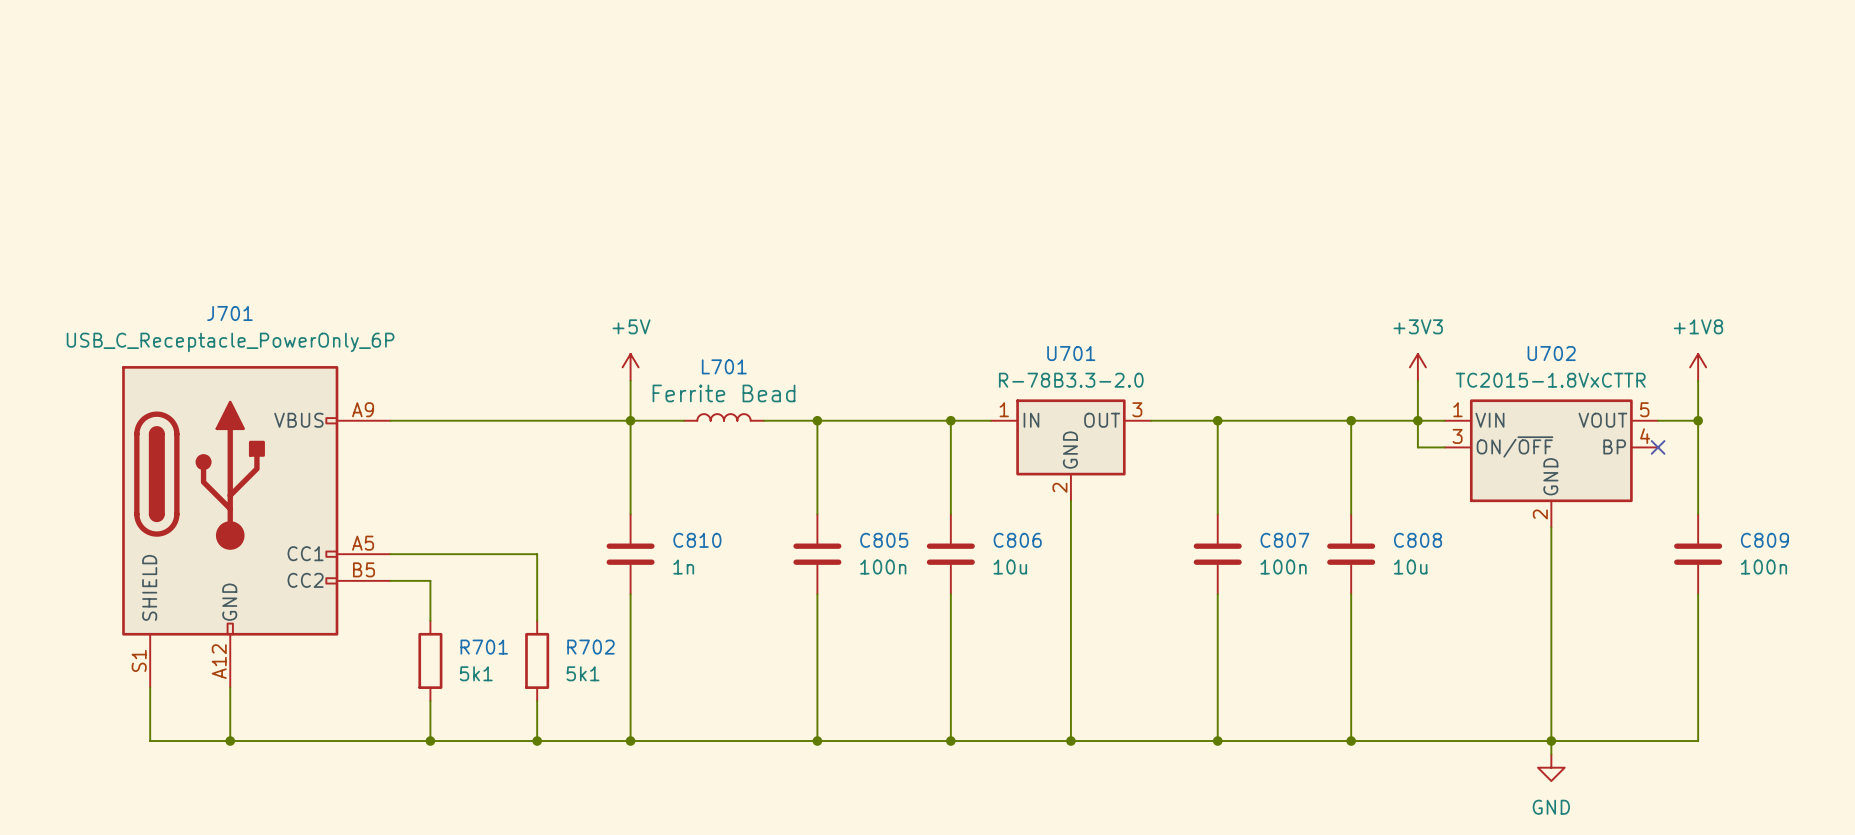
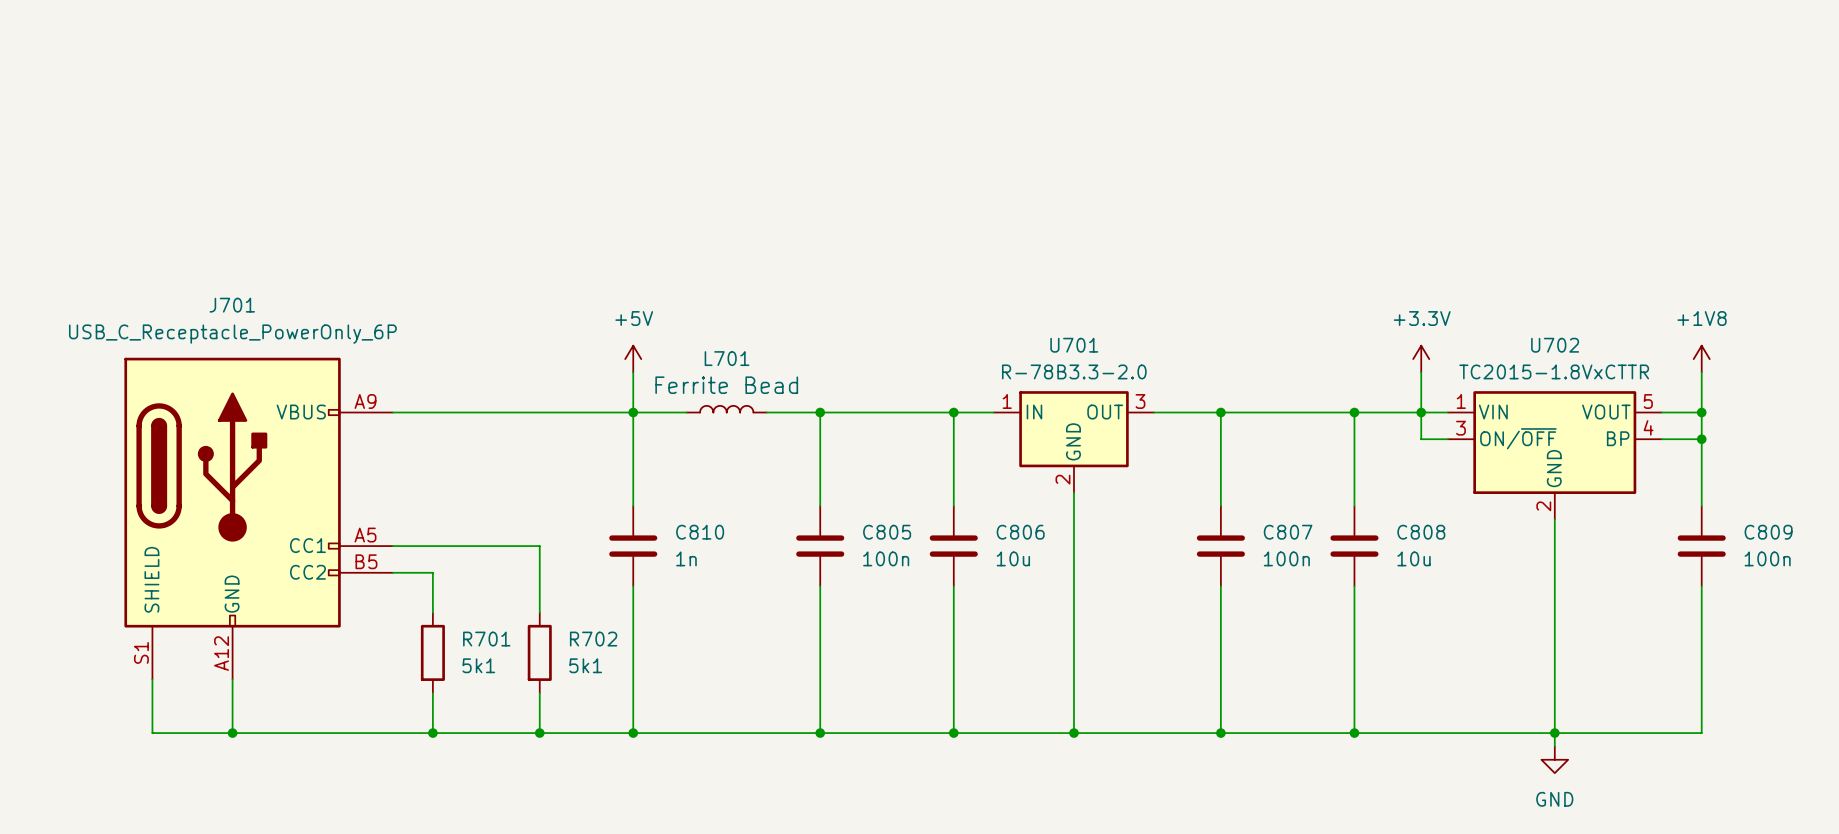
power symbol: +3V3 (1417, 367) -> +3.3V (1421, 359)
wire: none -> (1661, 439) (1701, 439)
no-connect mark: (1658, 447) -> none
junction: none -> (1701, 439)

